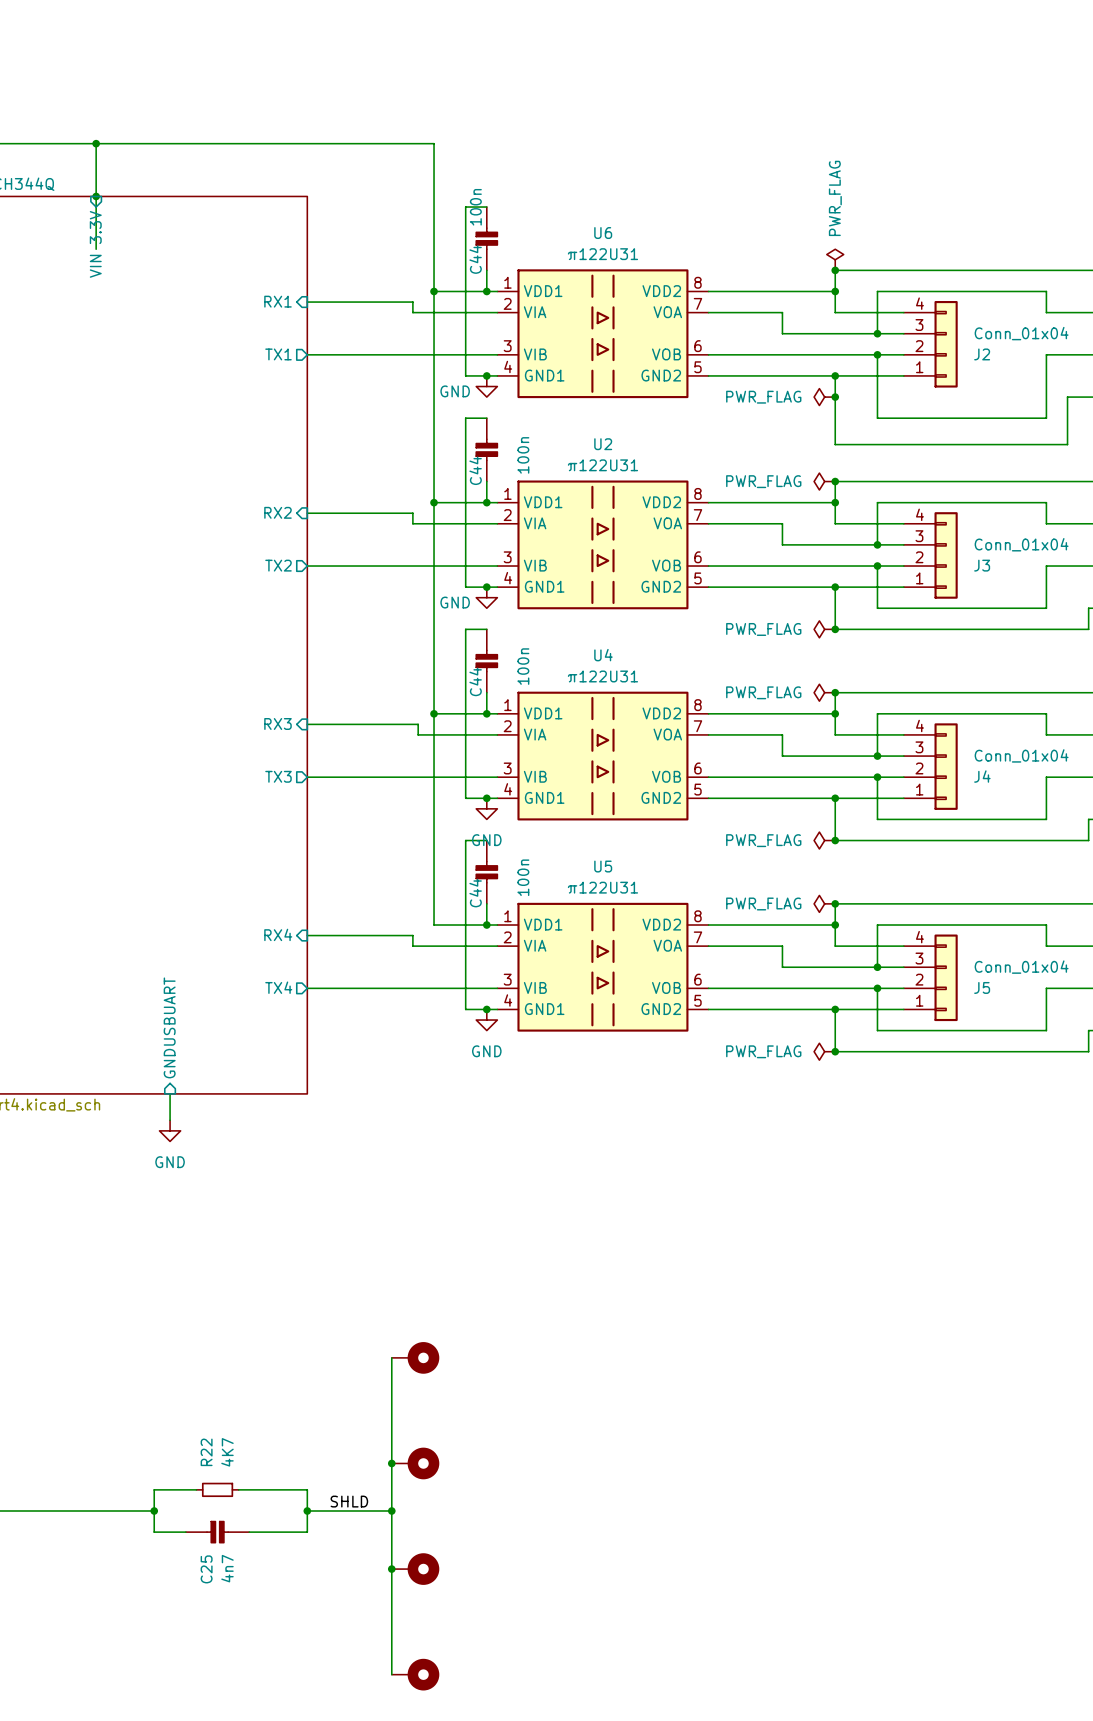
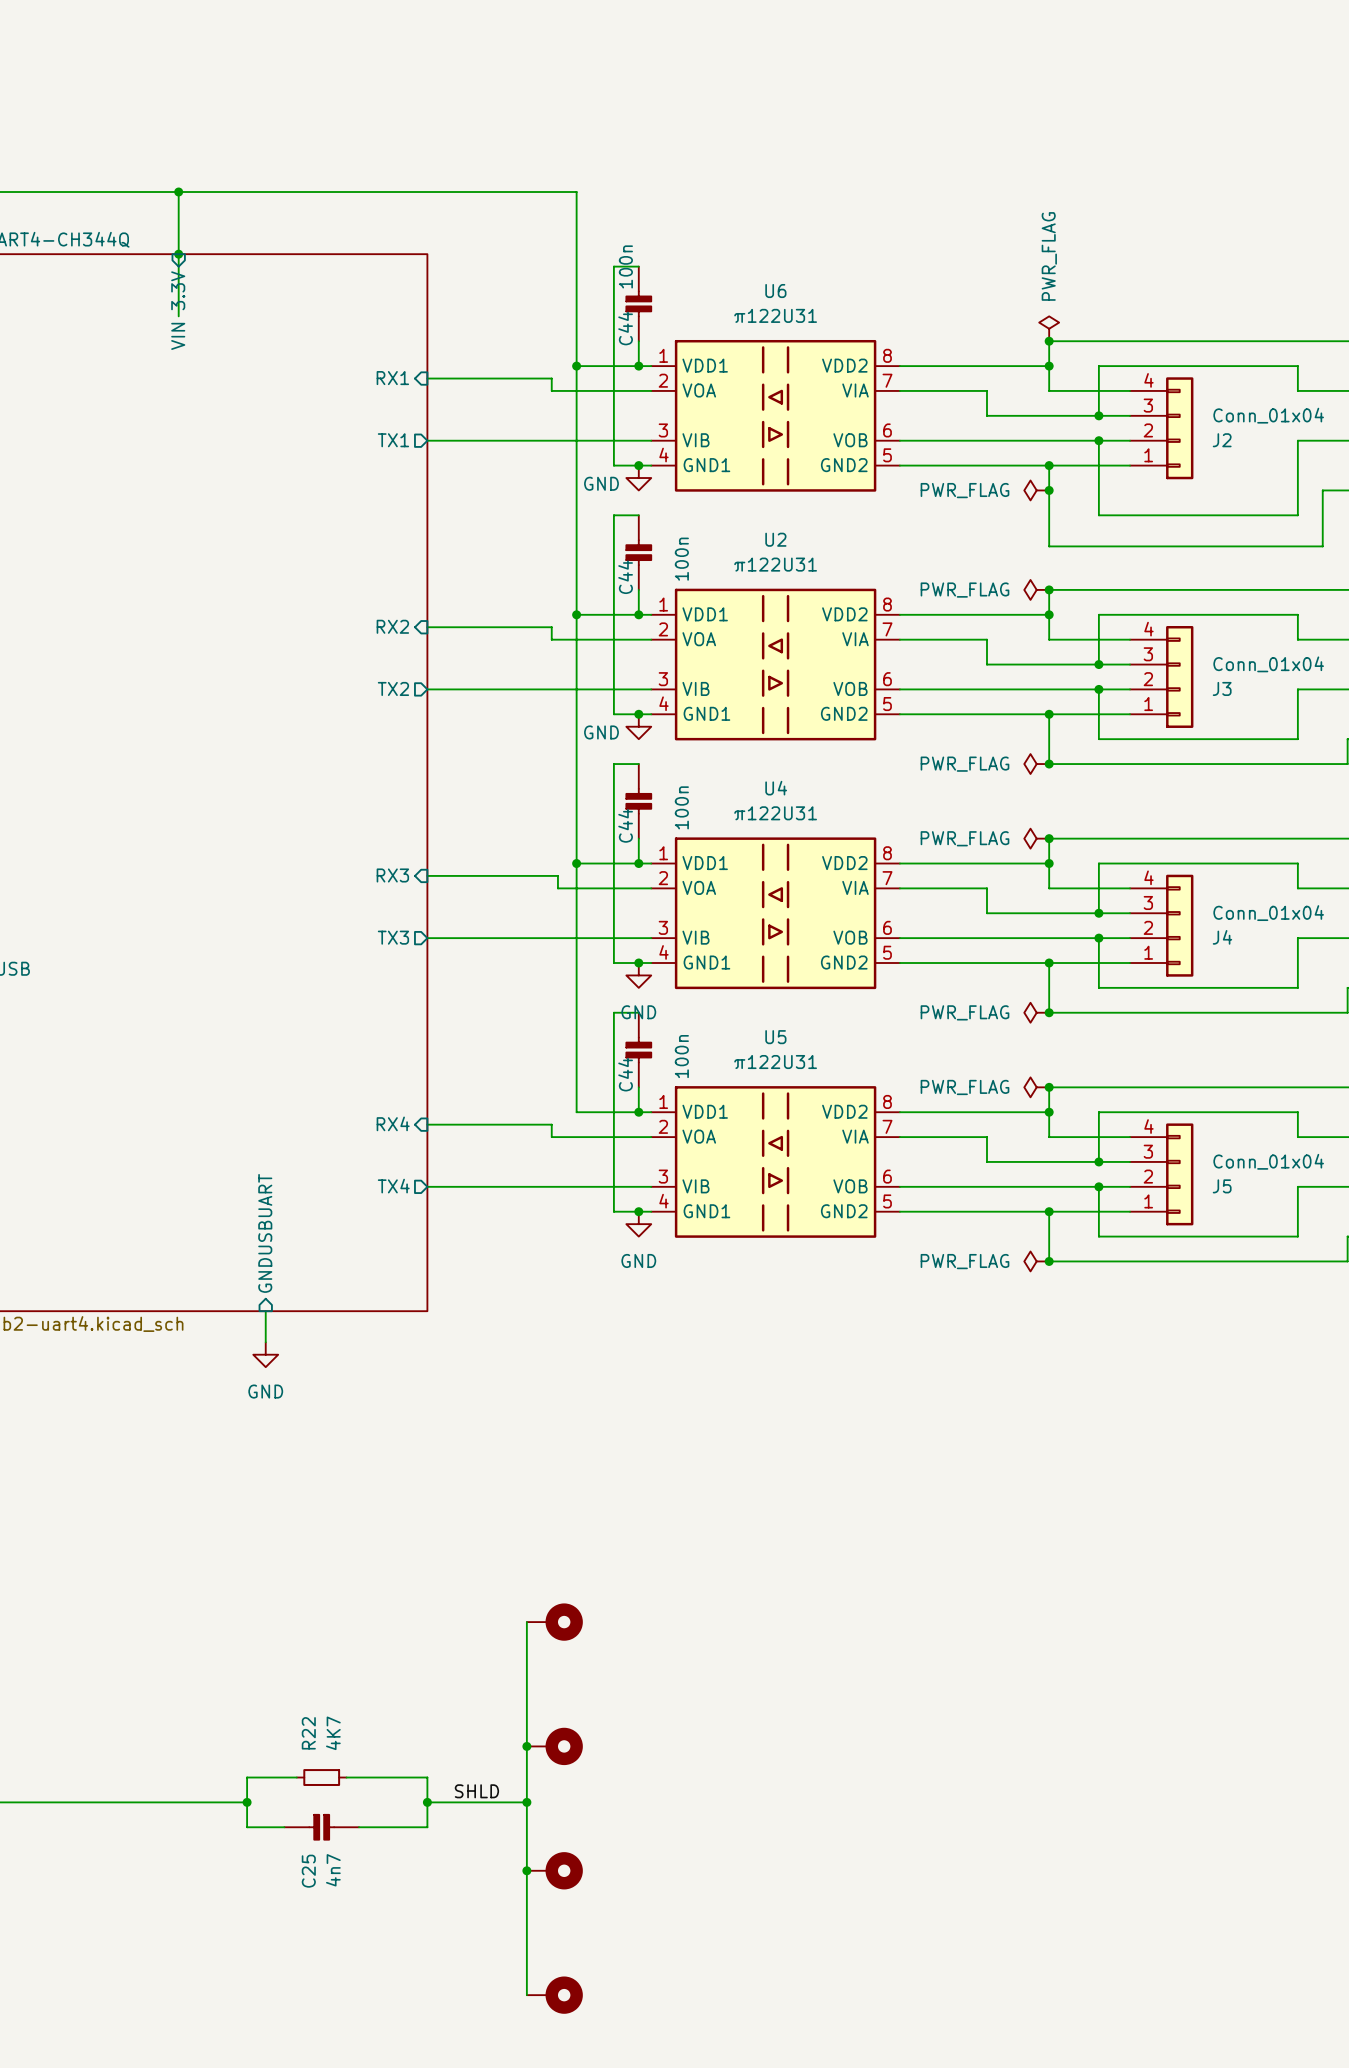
U6 symbol: [497, 269, 709, 399] -> [651, 339, 900, 492]
U2 symbol: [497, 480, 709, 610] -> [651, 588, 900, 741]
U4 symbol: [497, 691, 709, 821] -> [651, 837, 900, 990]
U5 symbol: [497, 902, 709, 1032] -> [651, 1086, 900, 1238]

